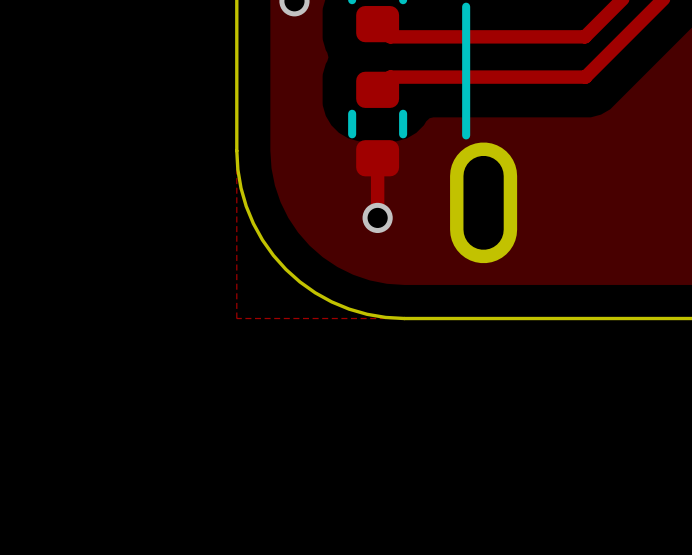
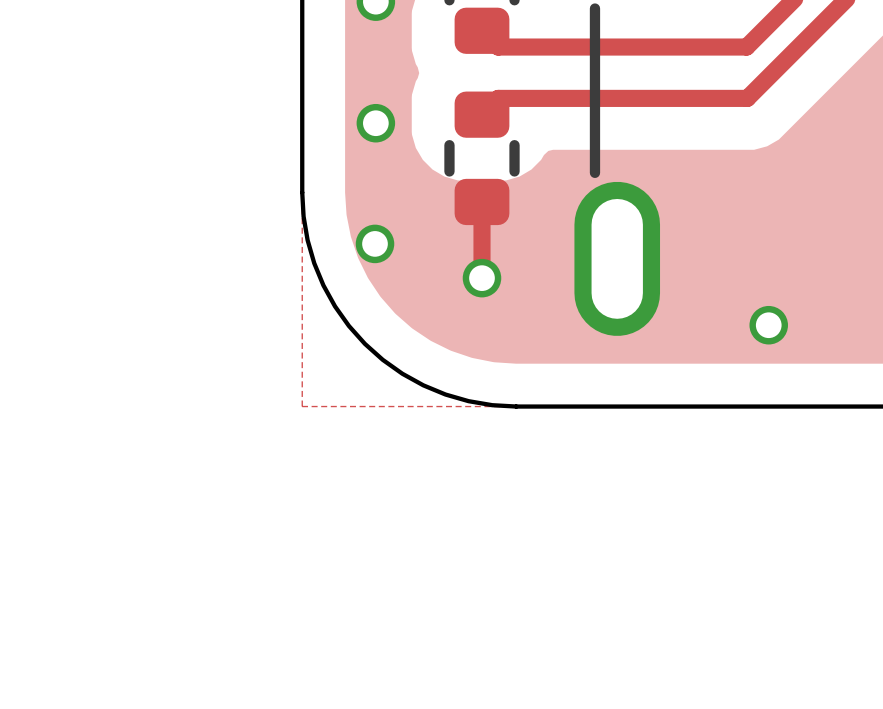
via: none -> (375, 123)
via: none -> (375, 243)
via: none -> (768, 325)

